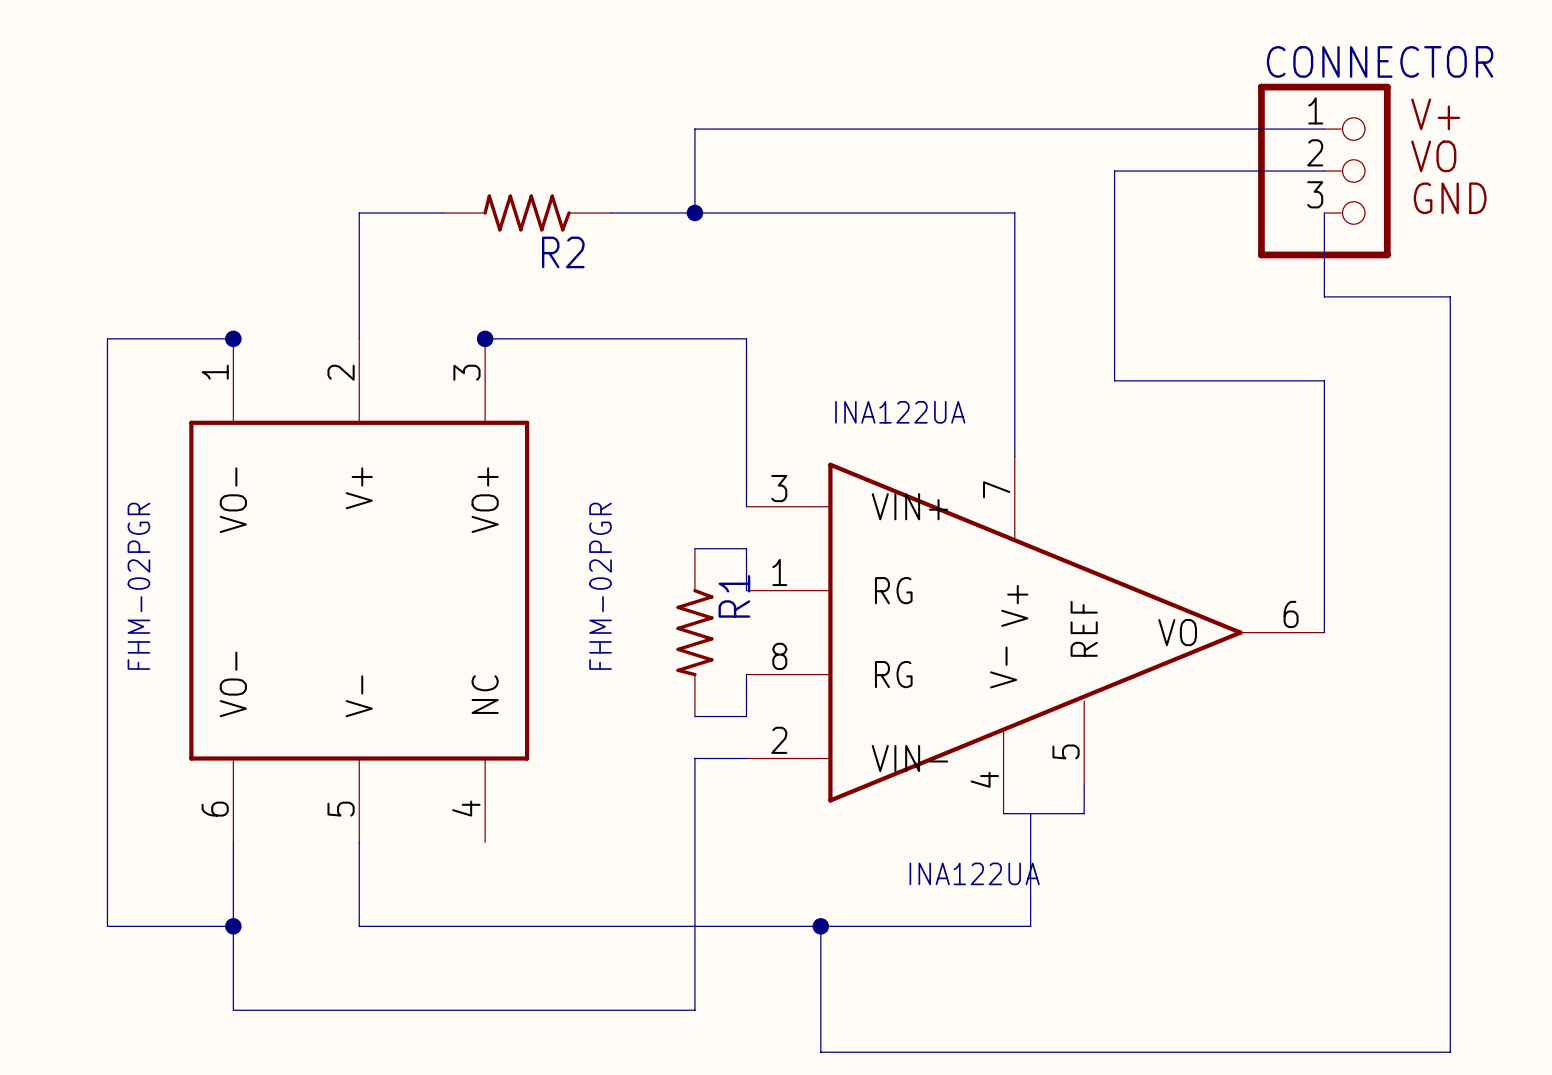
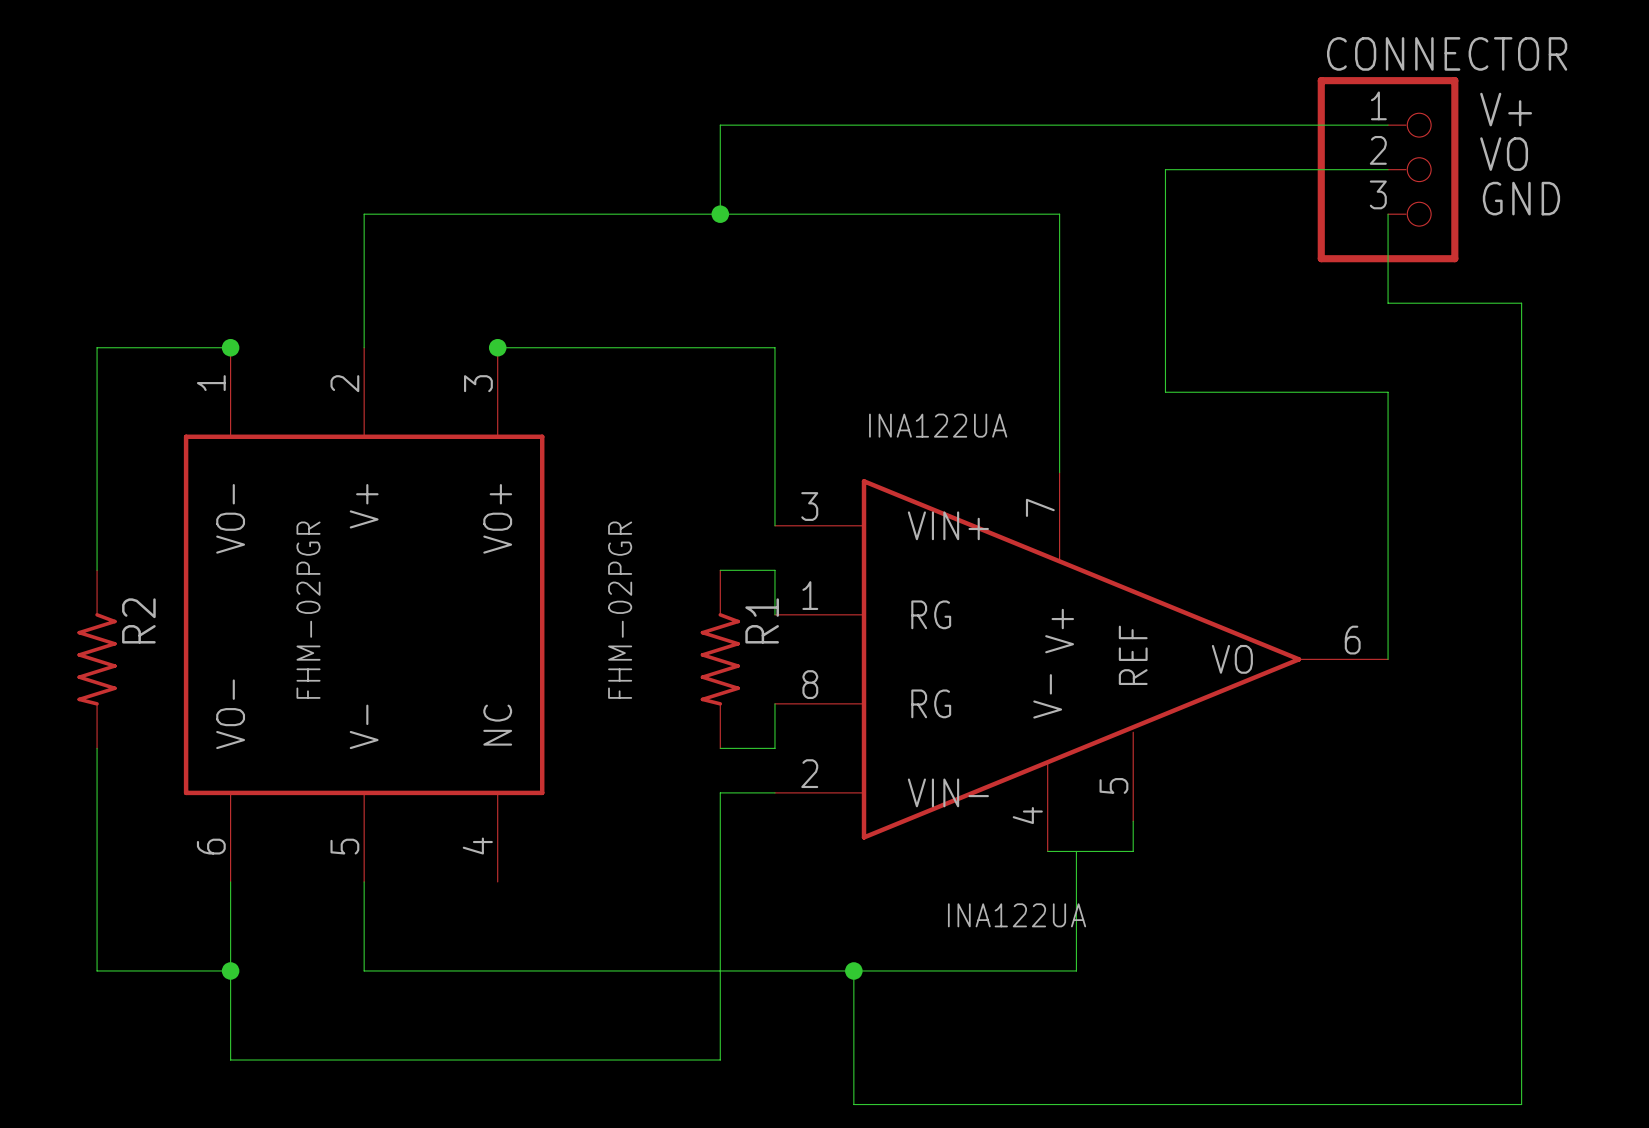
R2 rotation: 0° (527, 212) -> 90° counterclockwise (97, 659)
R2 position: (527, 212) -> (97, 659)
FHM-02PGR name position: FHM-02PGR (138, 586) -> FHM-02PGR (308, 610)

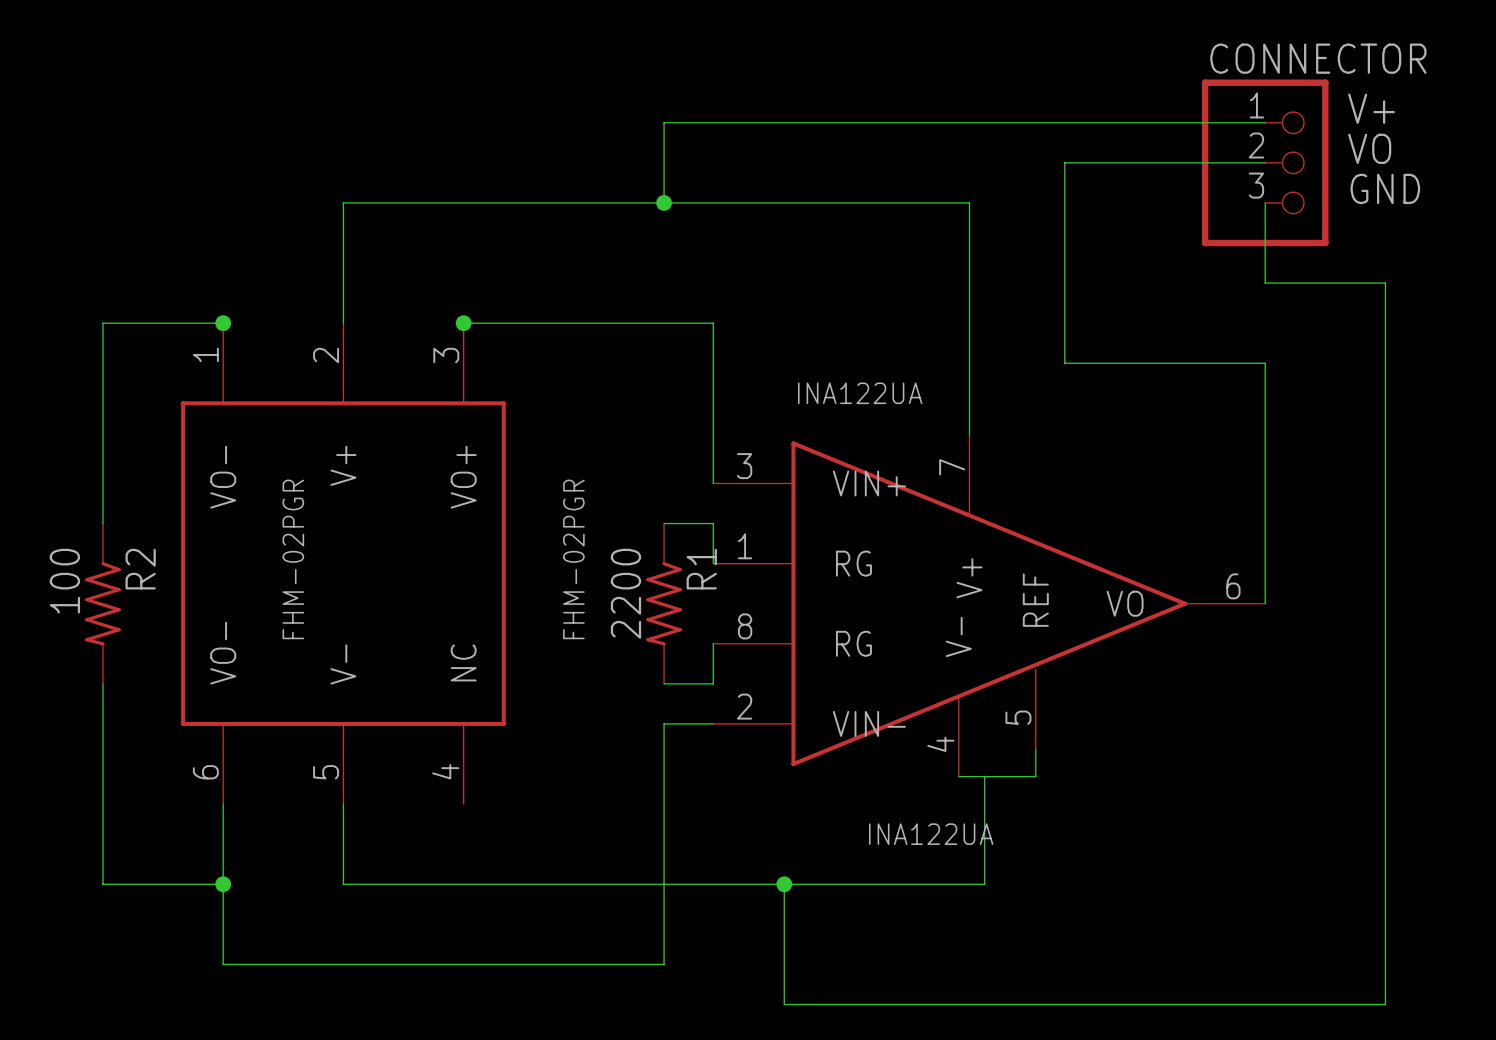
R2 value: none -> 100 (64, 581)
R1 value: none -> 2200 (625, 593)

